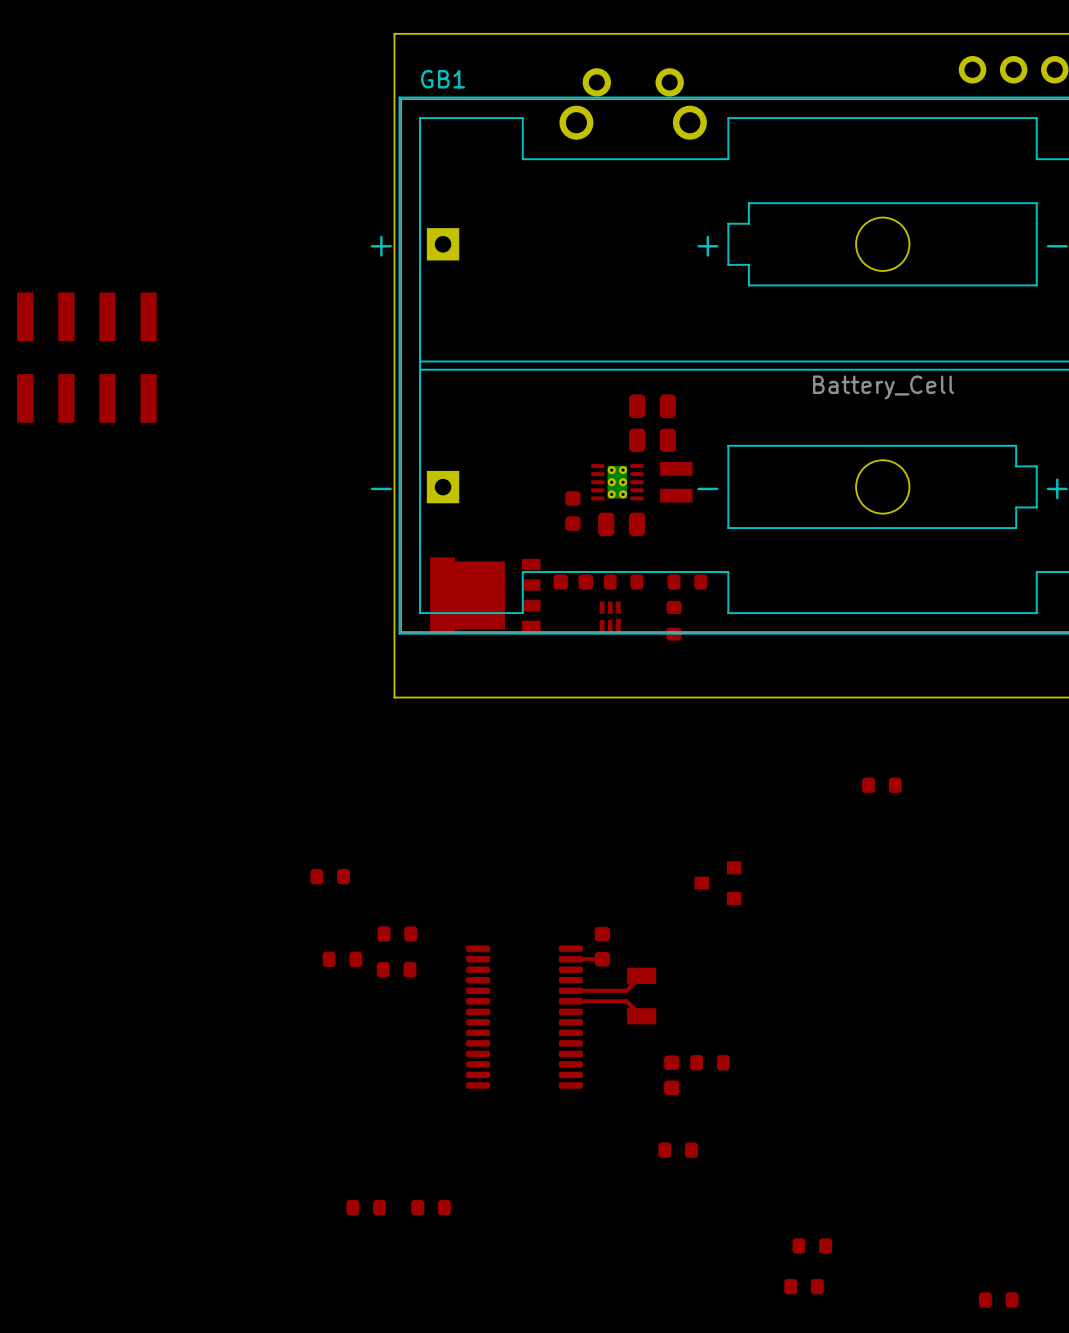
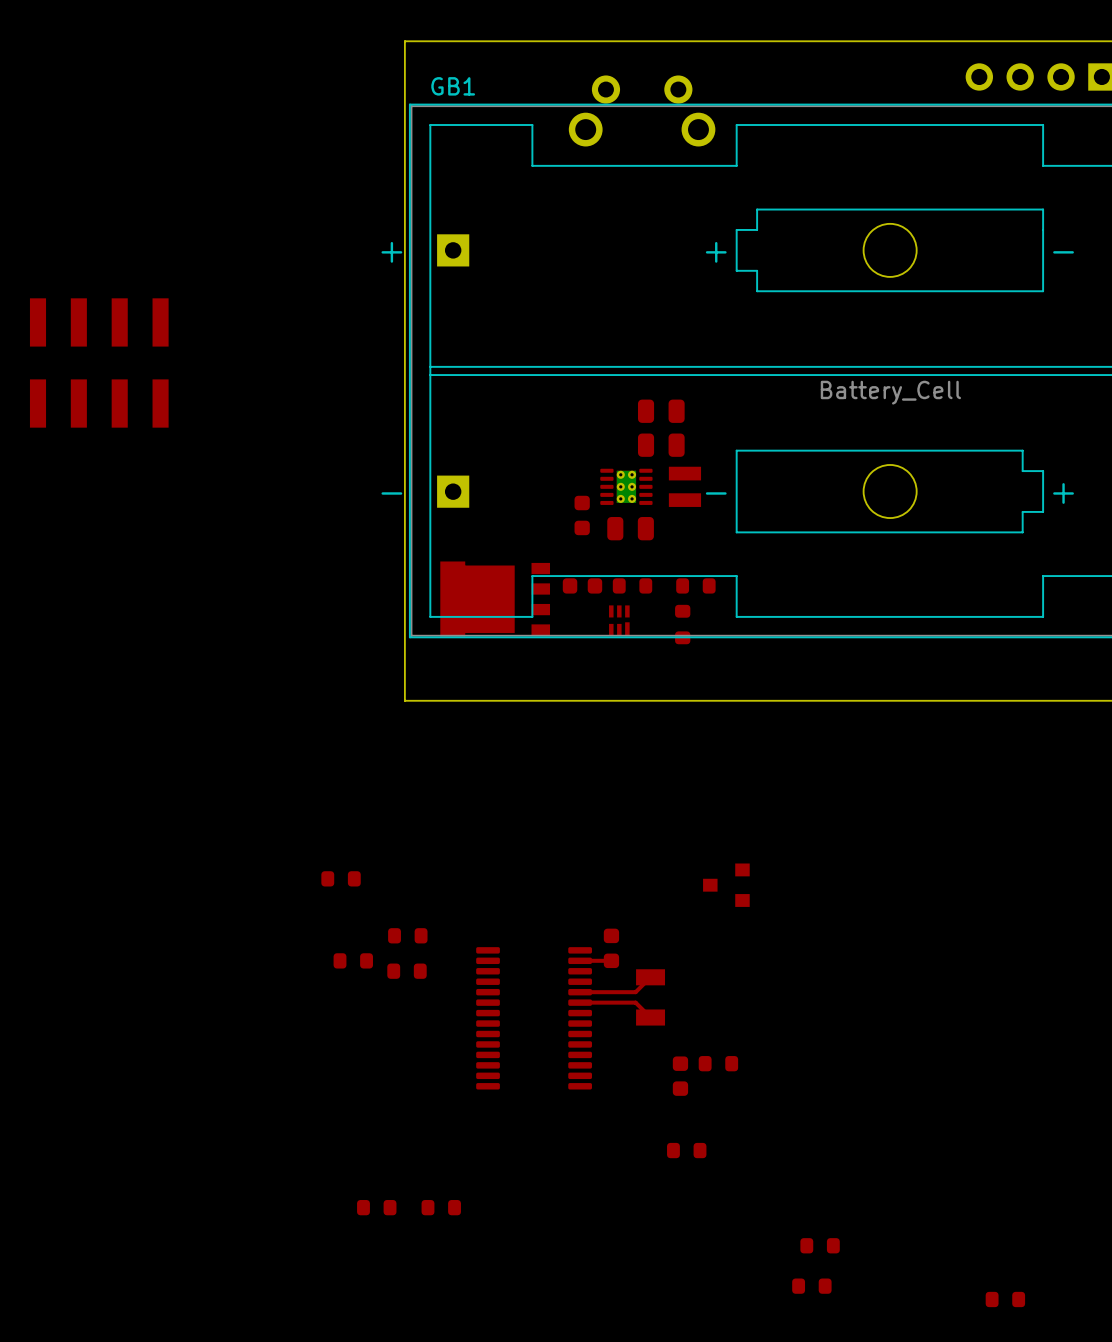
part: (881, 785) -> none

